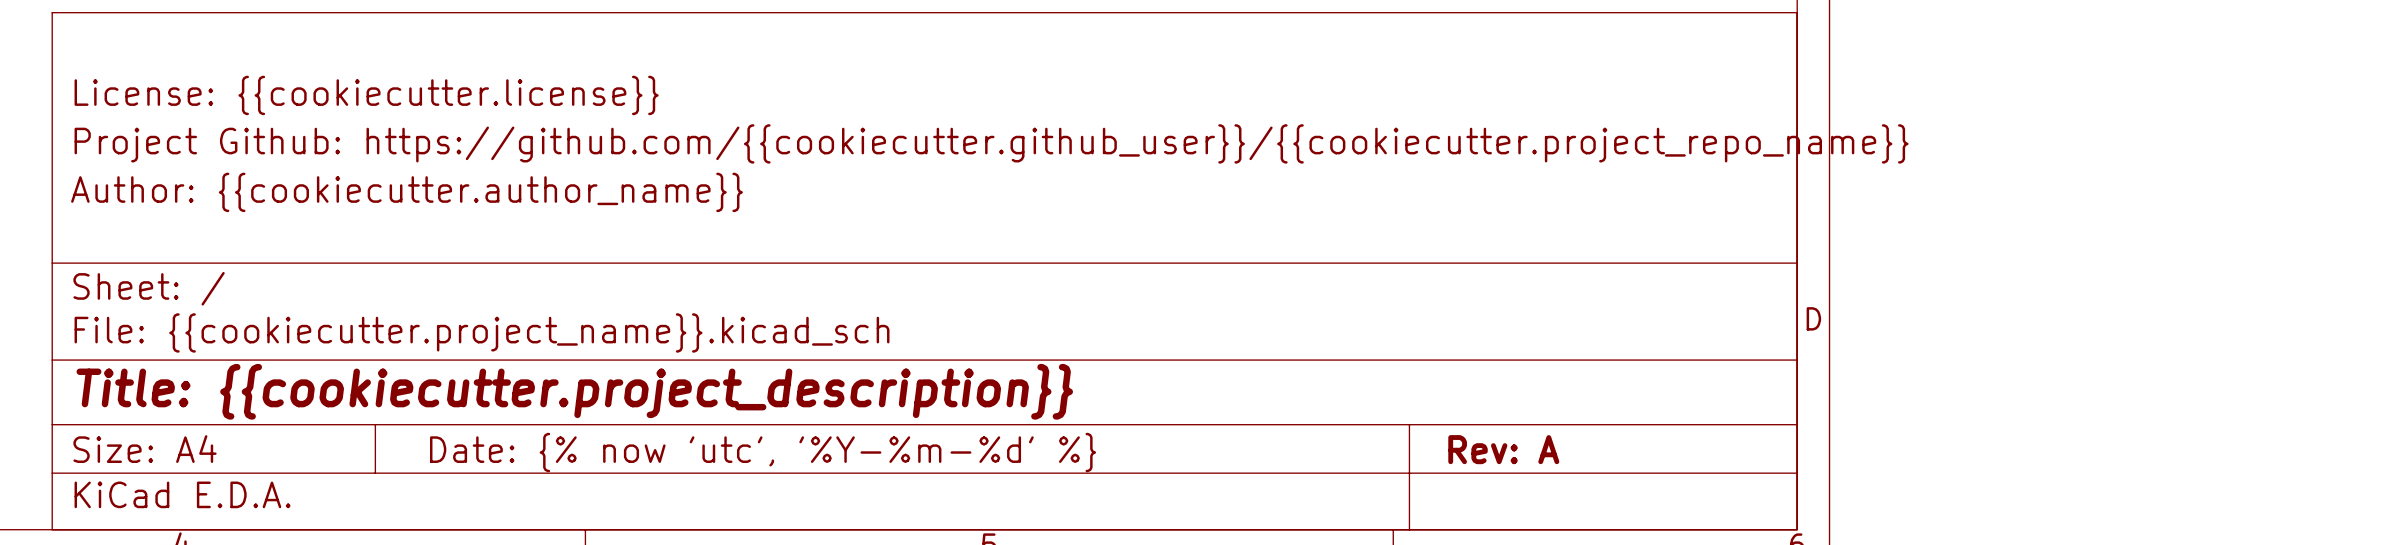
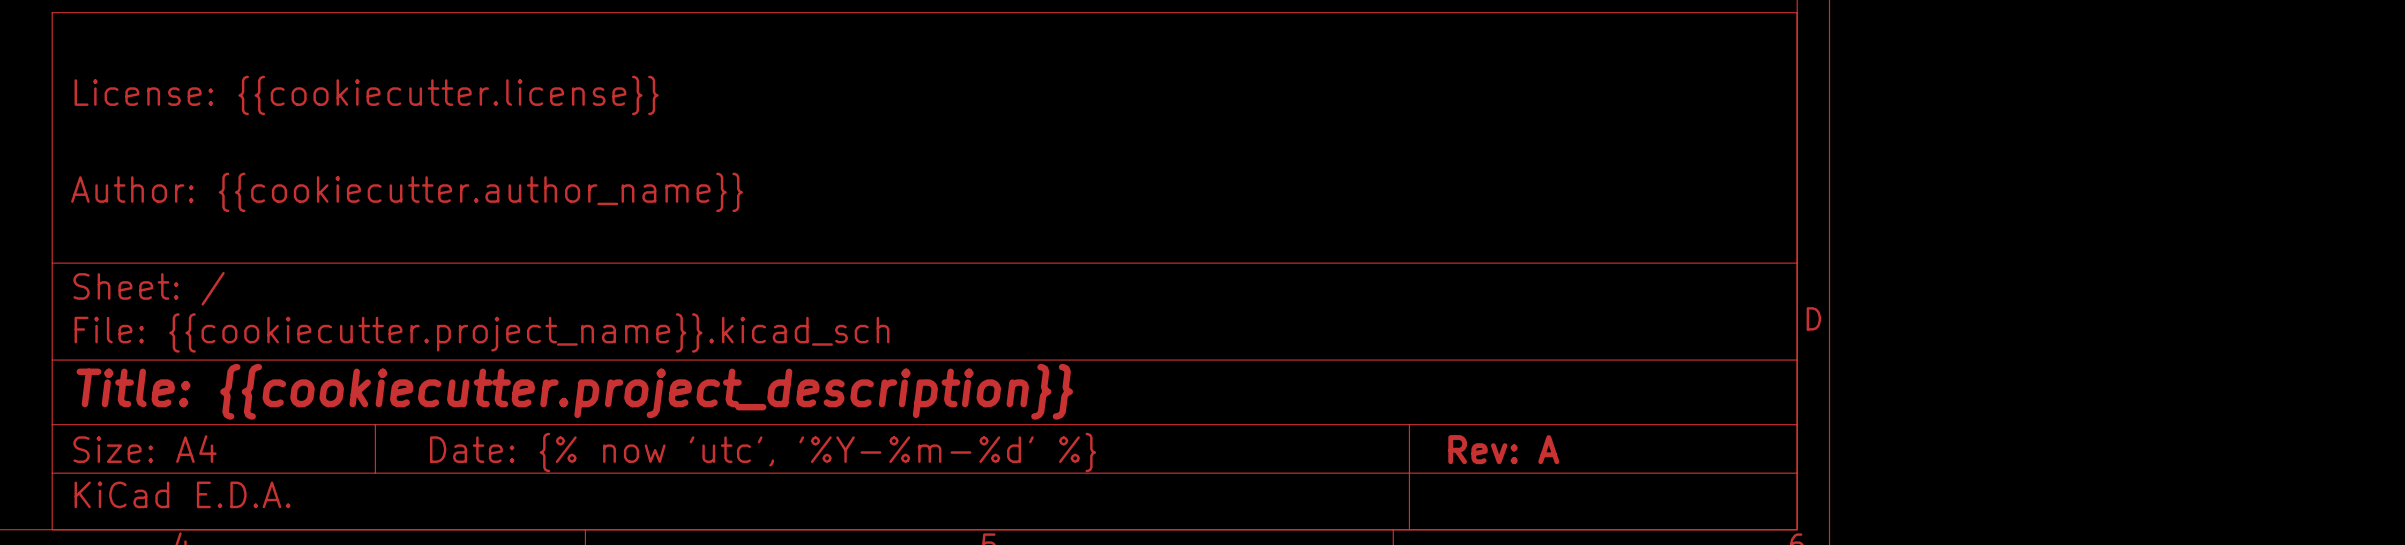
title block: Project Github: https://github.com/{{cookiecutter.github_user}}/{{cookiecutter.project_repo_name}} (991, 143) -> none

